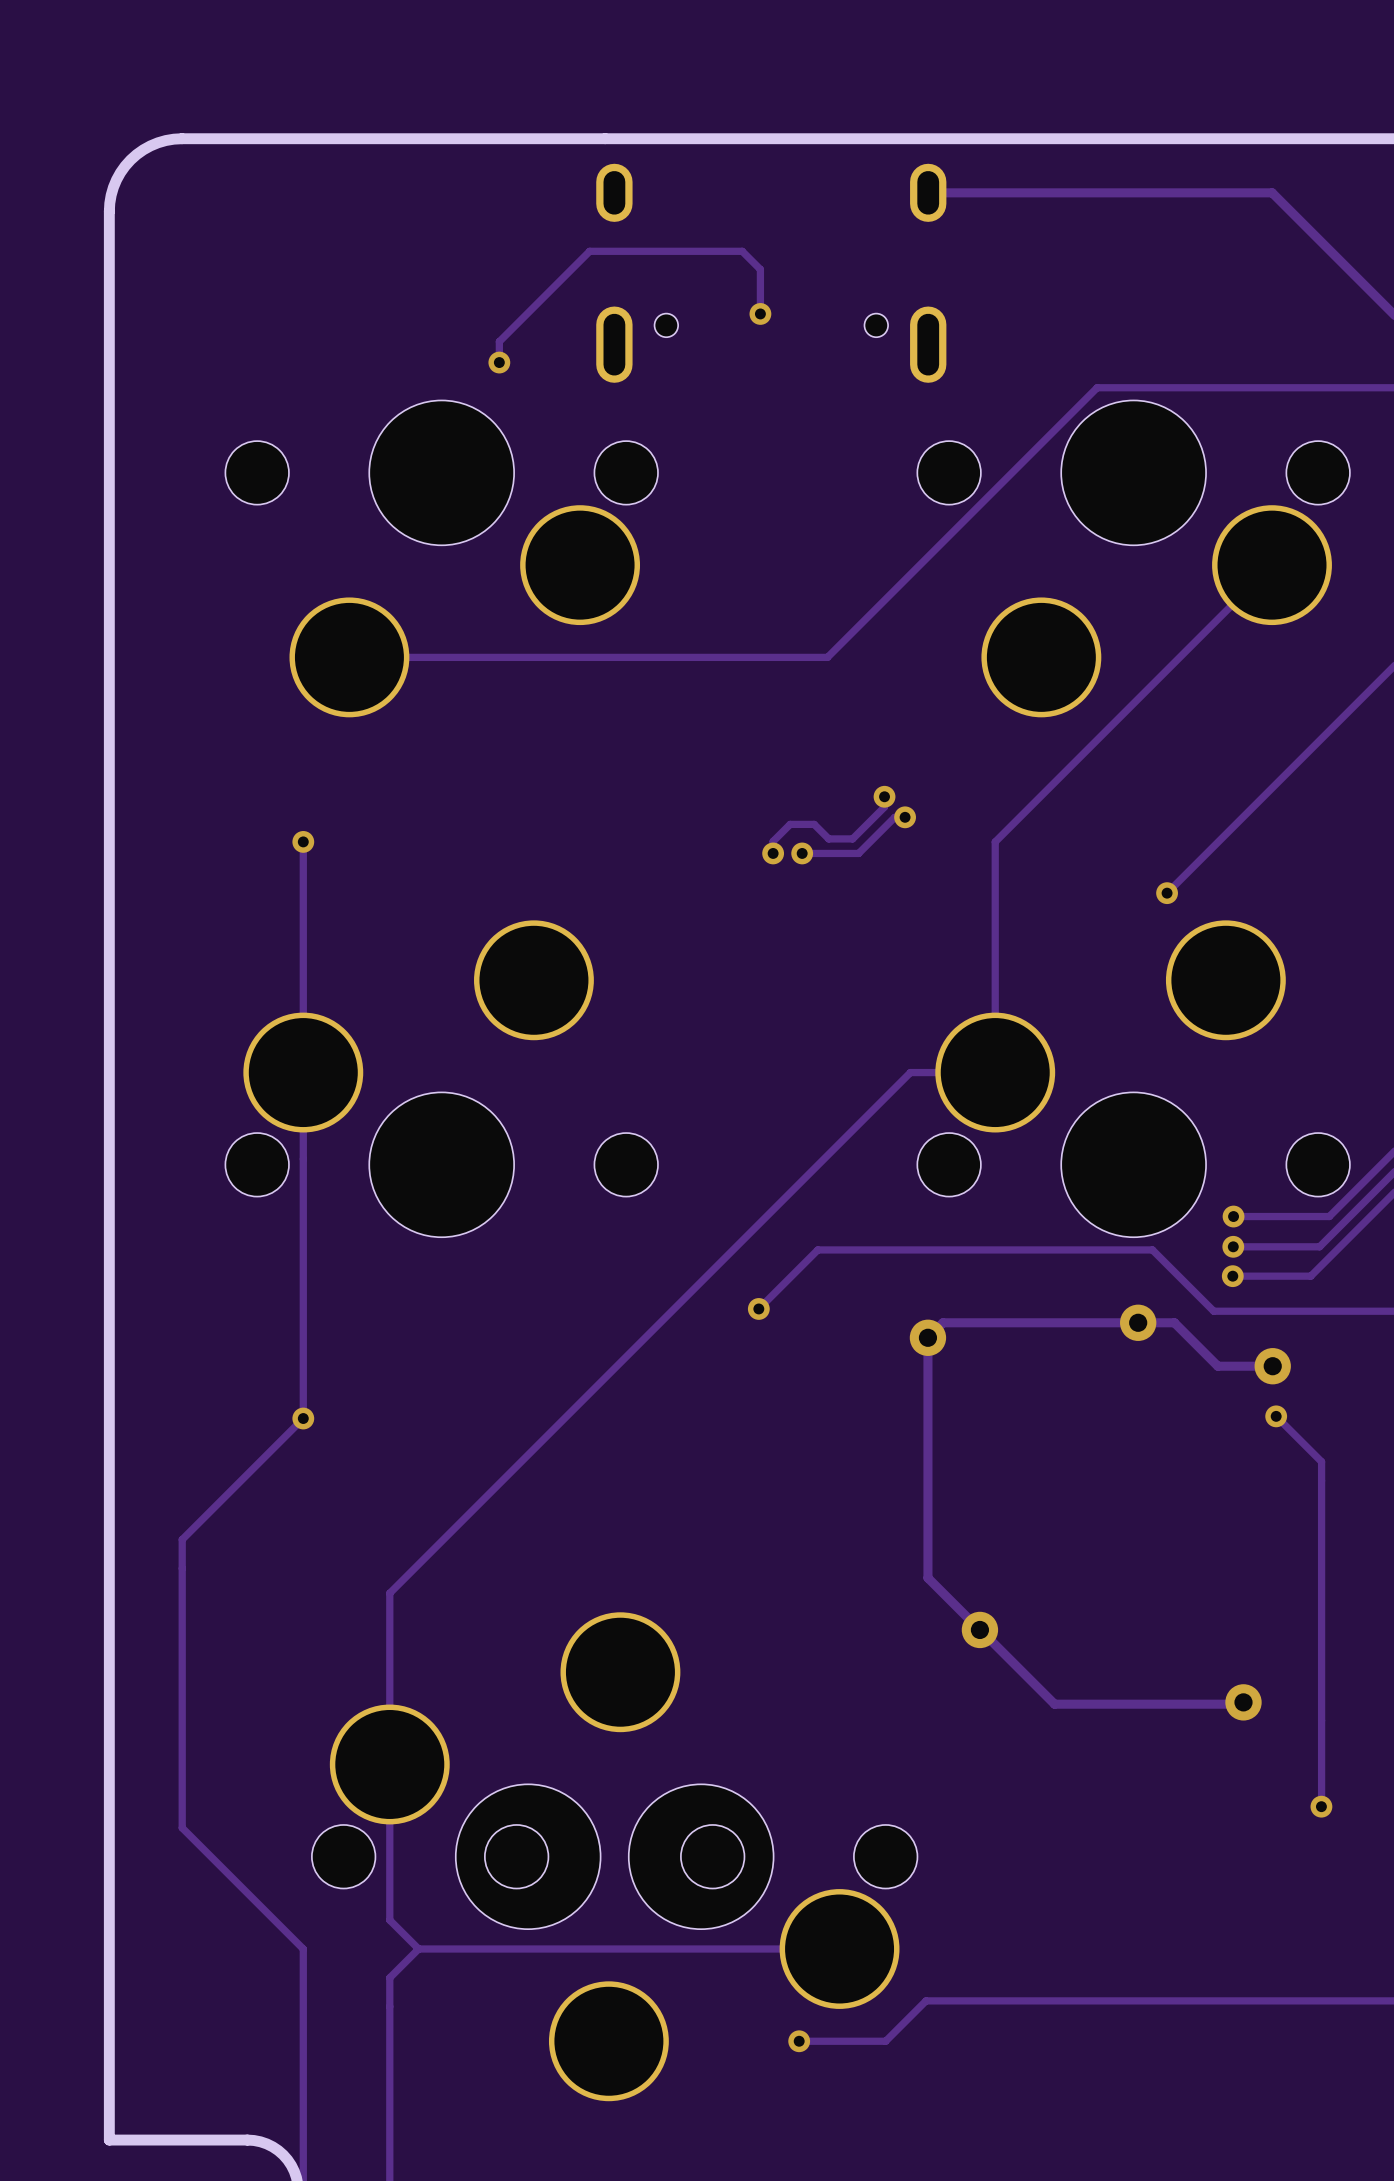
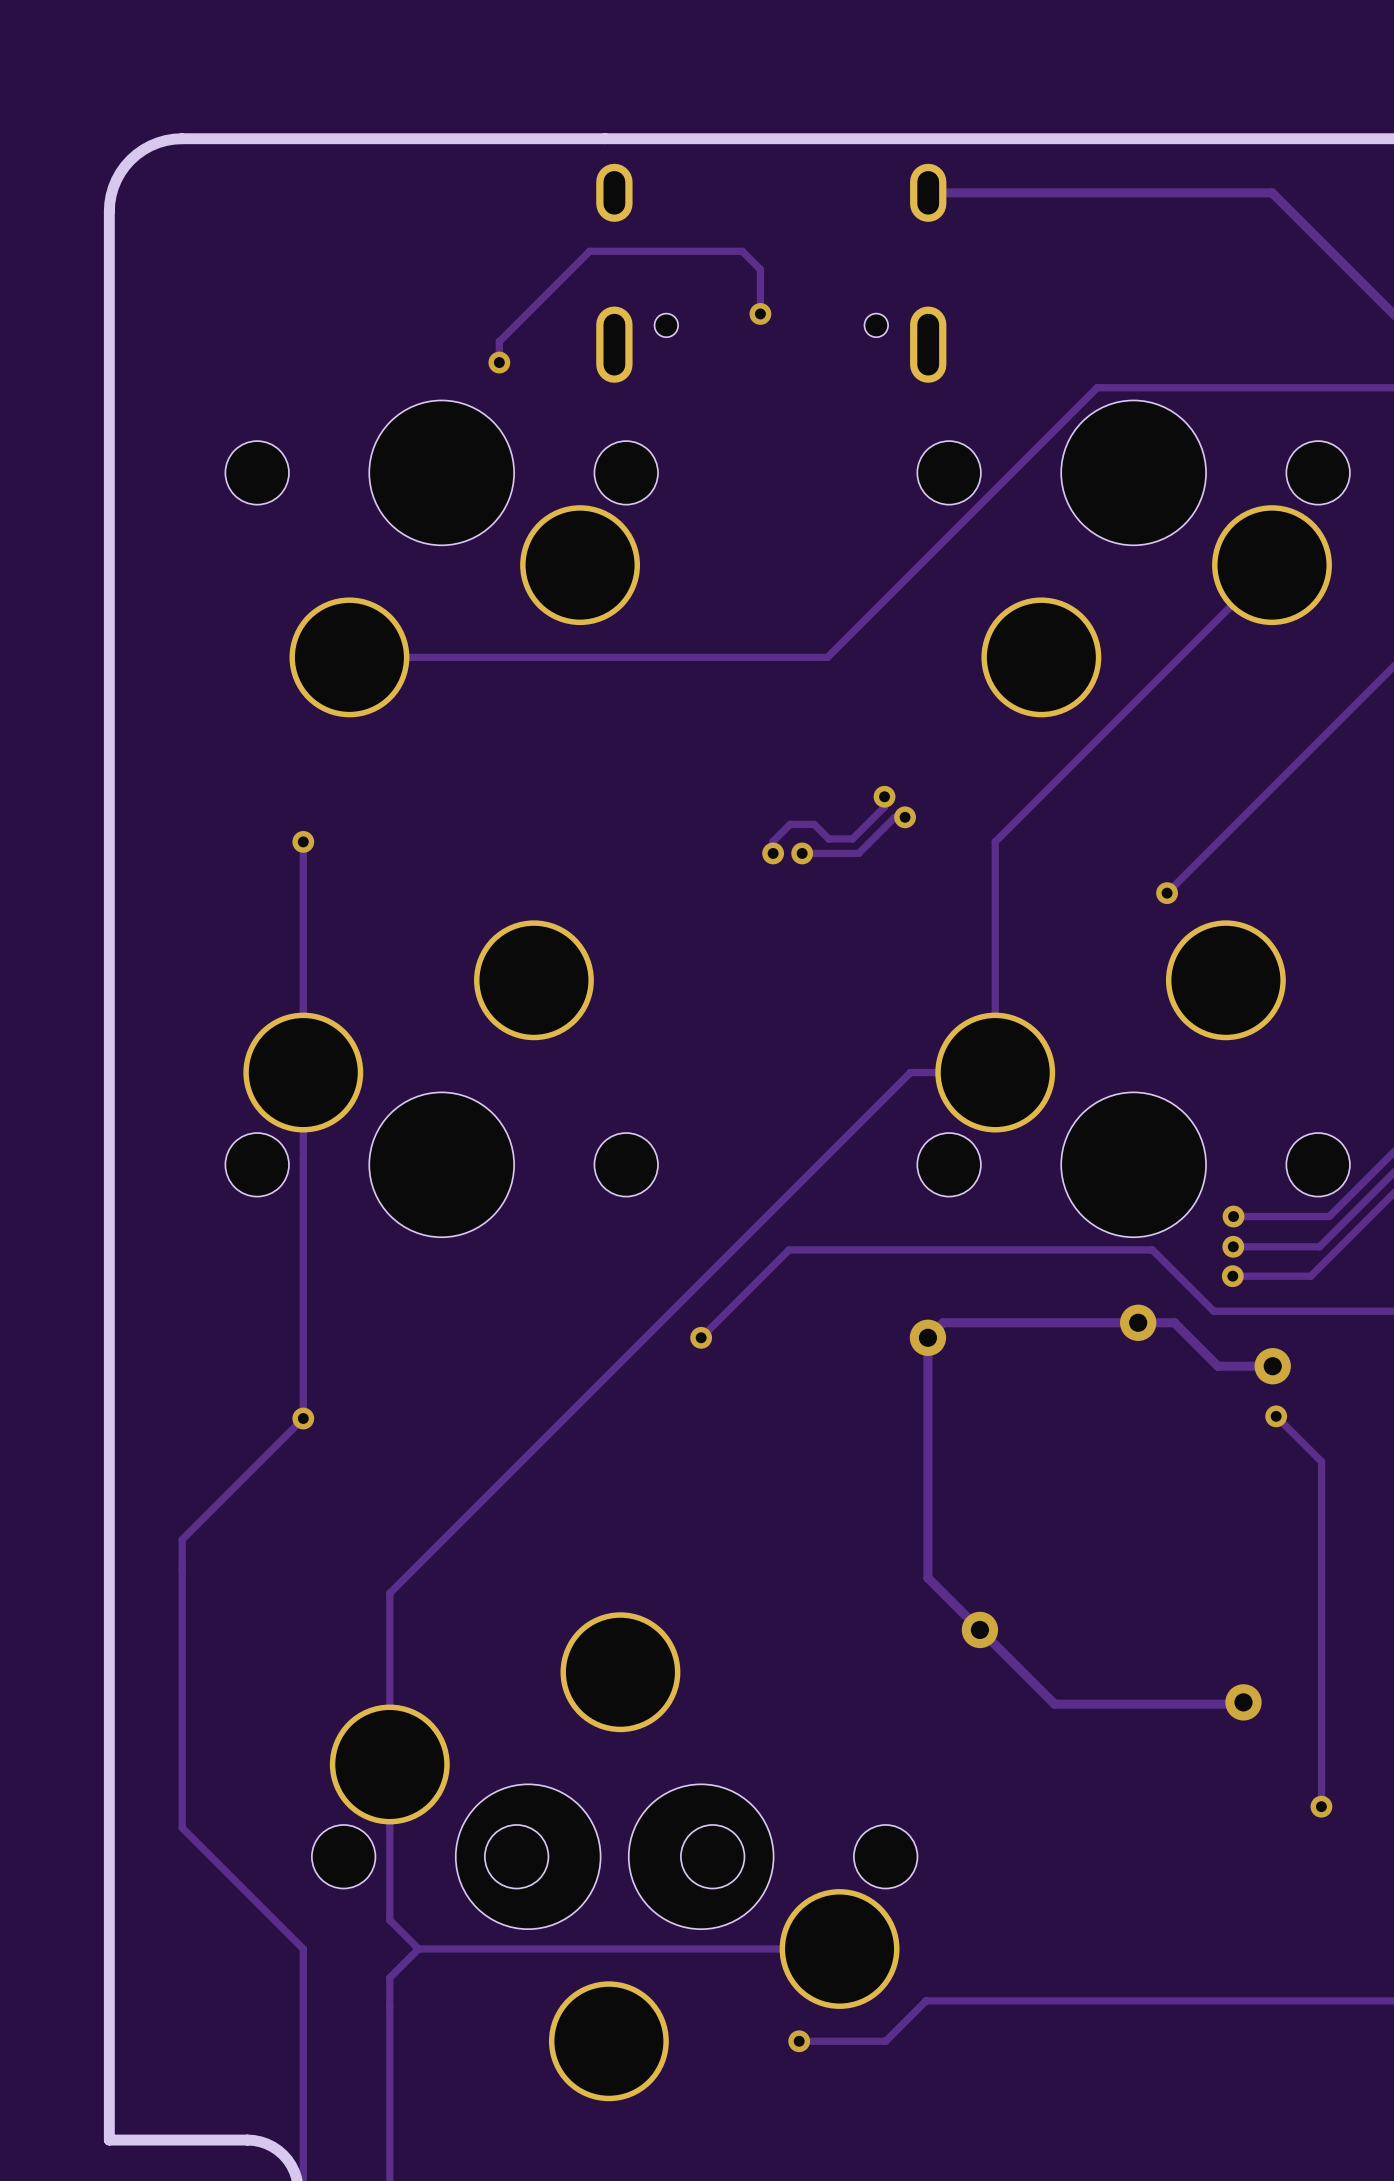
track: (817, 1249) (758, 1308) -> (817, 1249) (789, 1249) (701, 1337)
via position: (758, 1308) -> (701, 1337)

